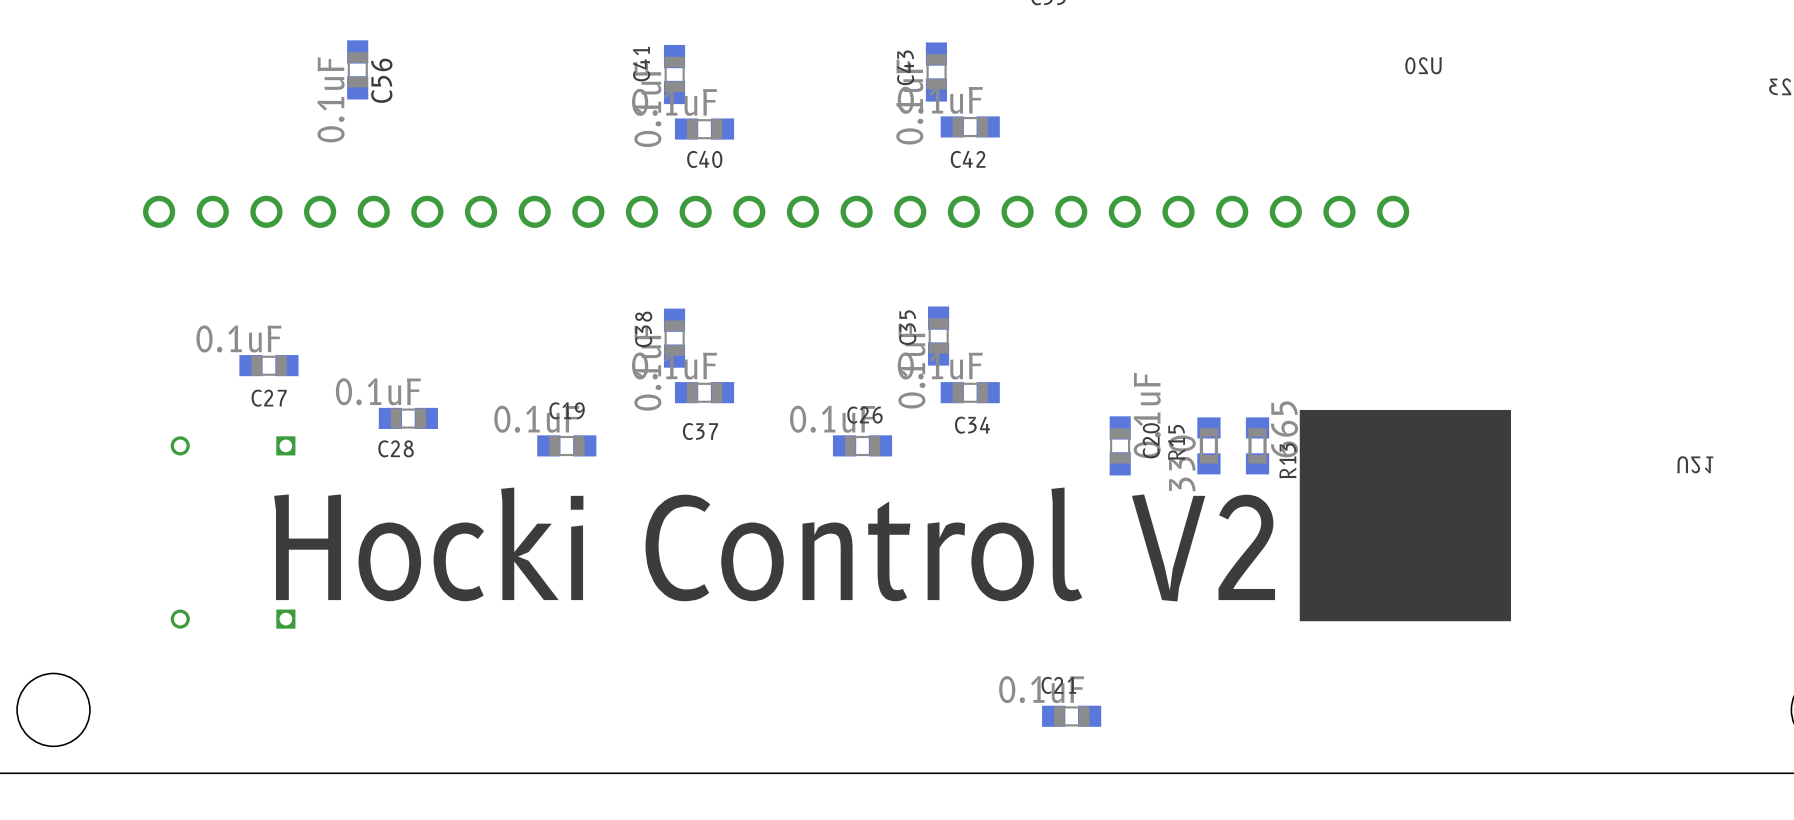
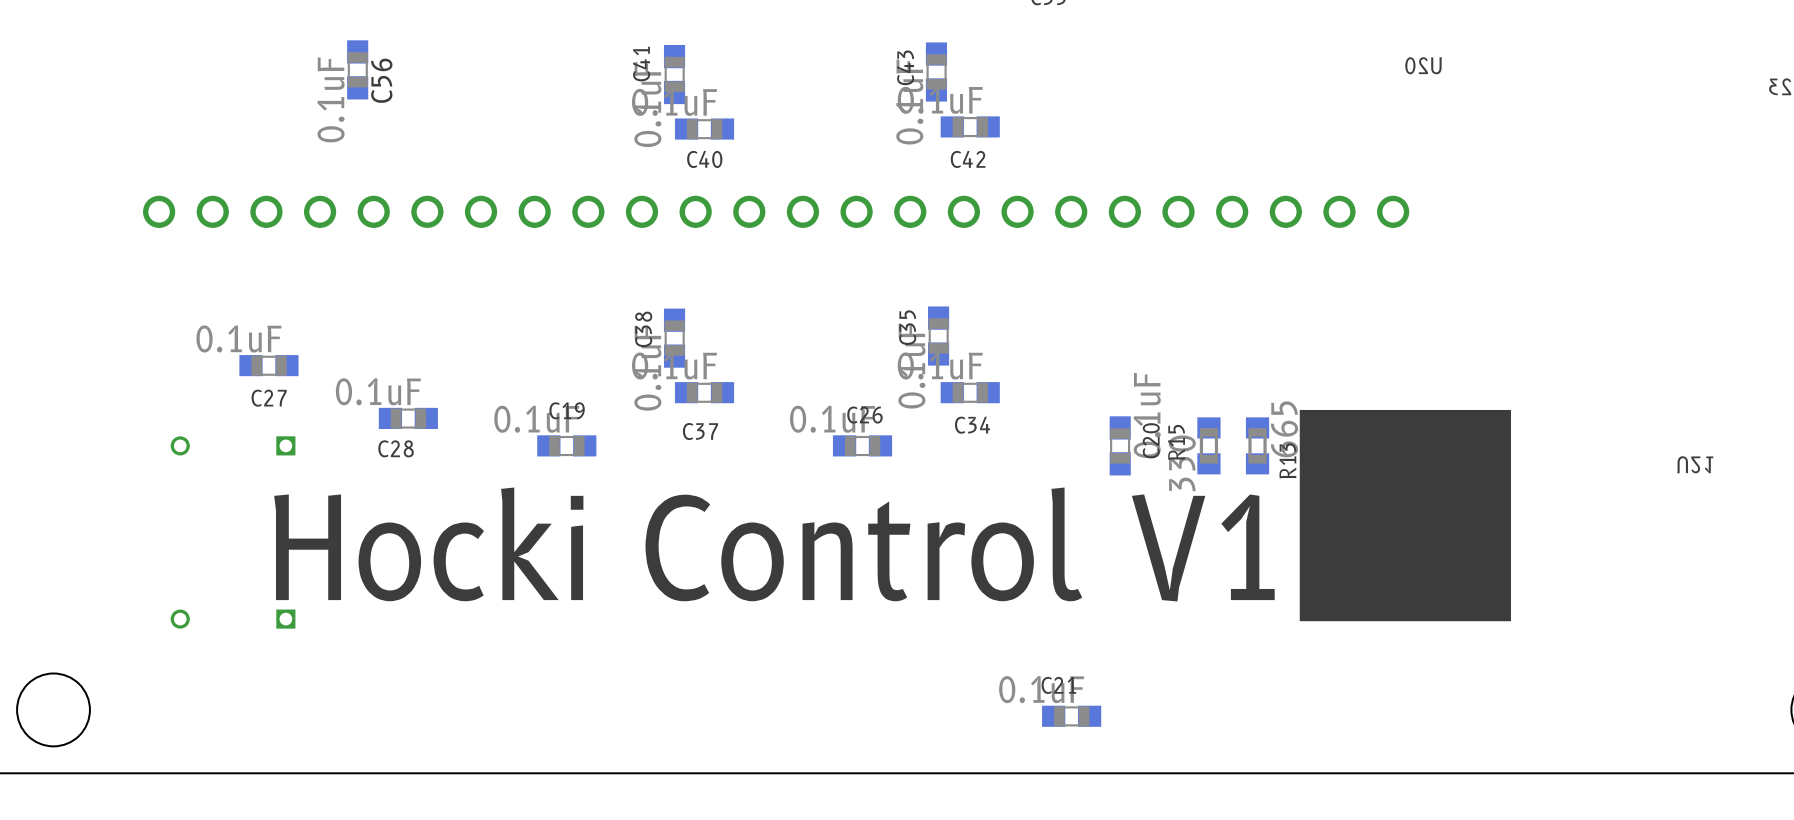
text: Hocki Control V2 (774, 544) -> Hocki Control V1 (774, 544)

